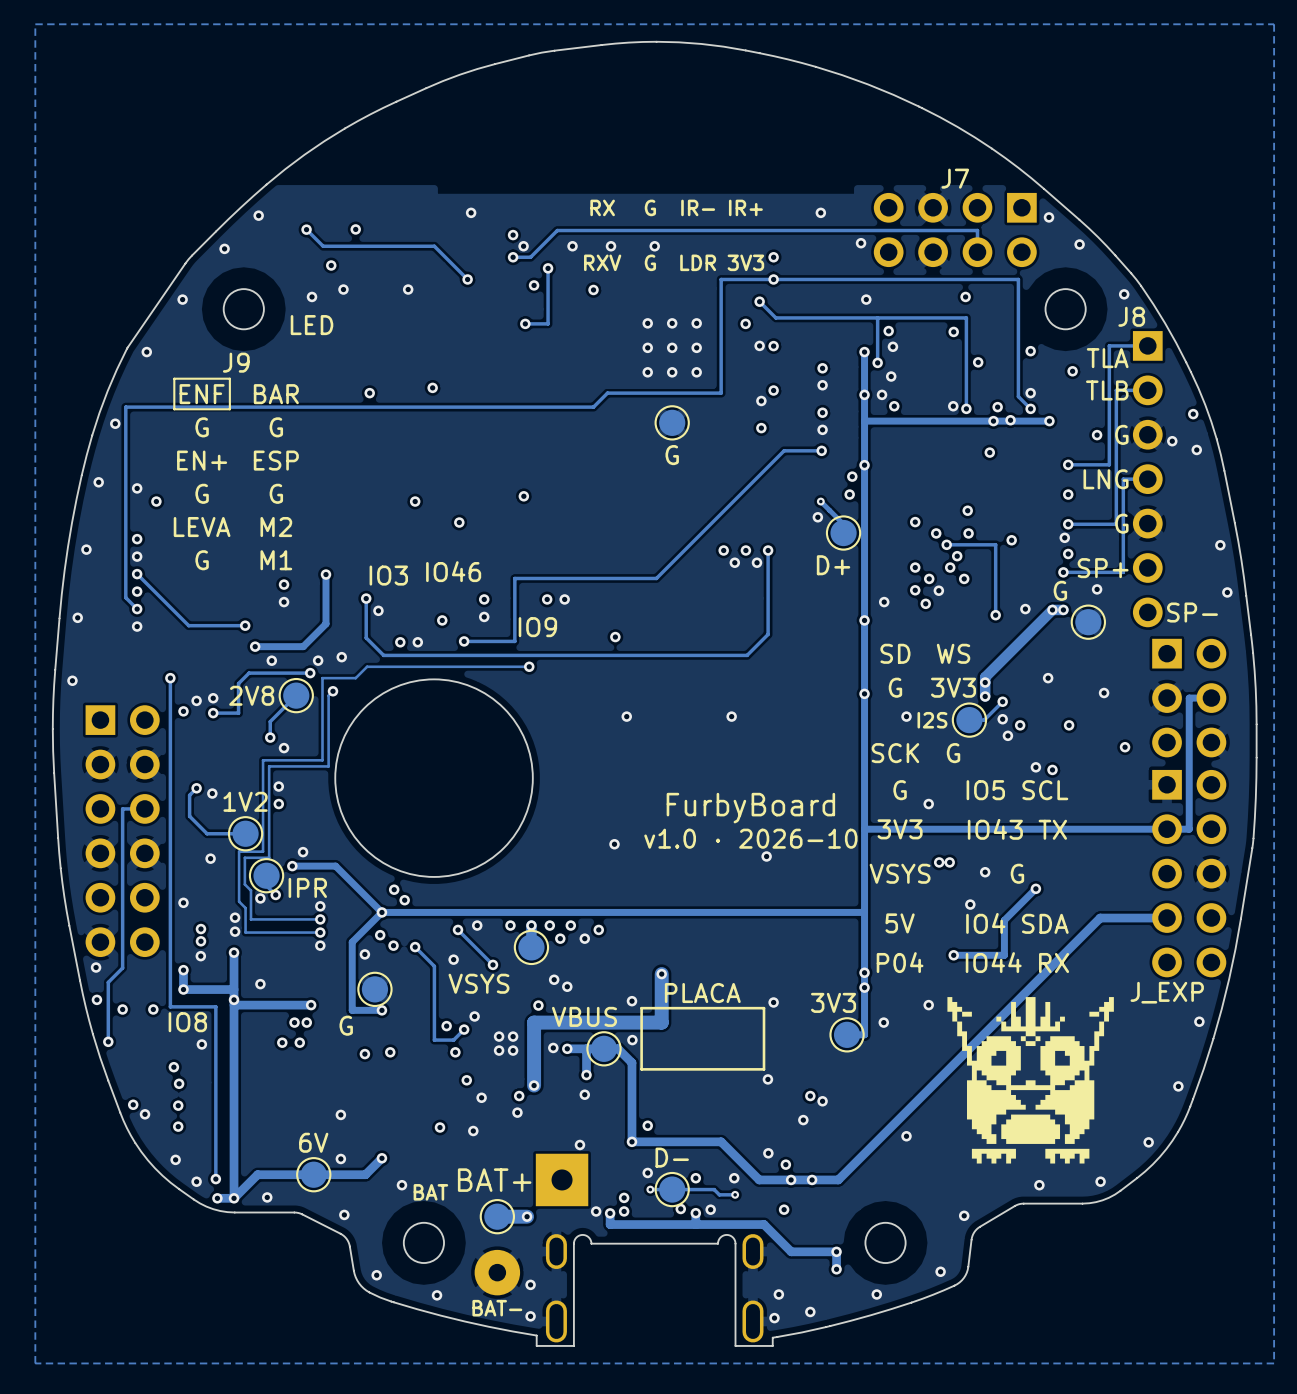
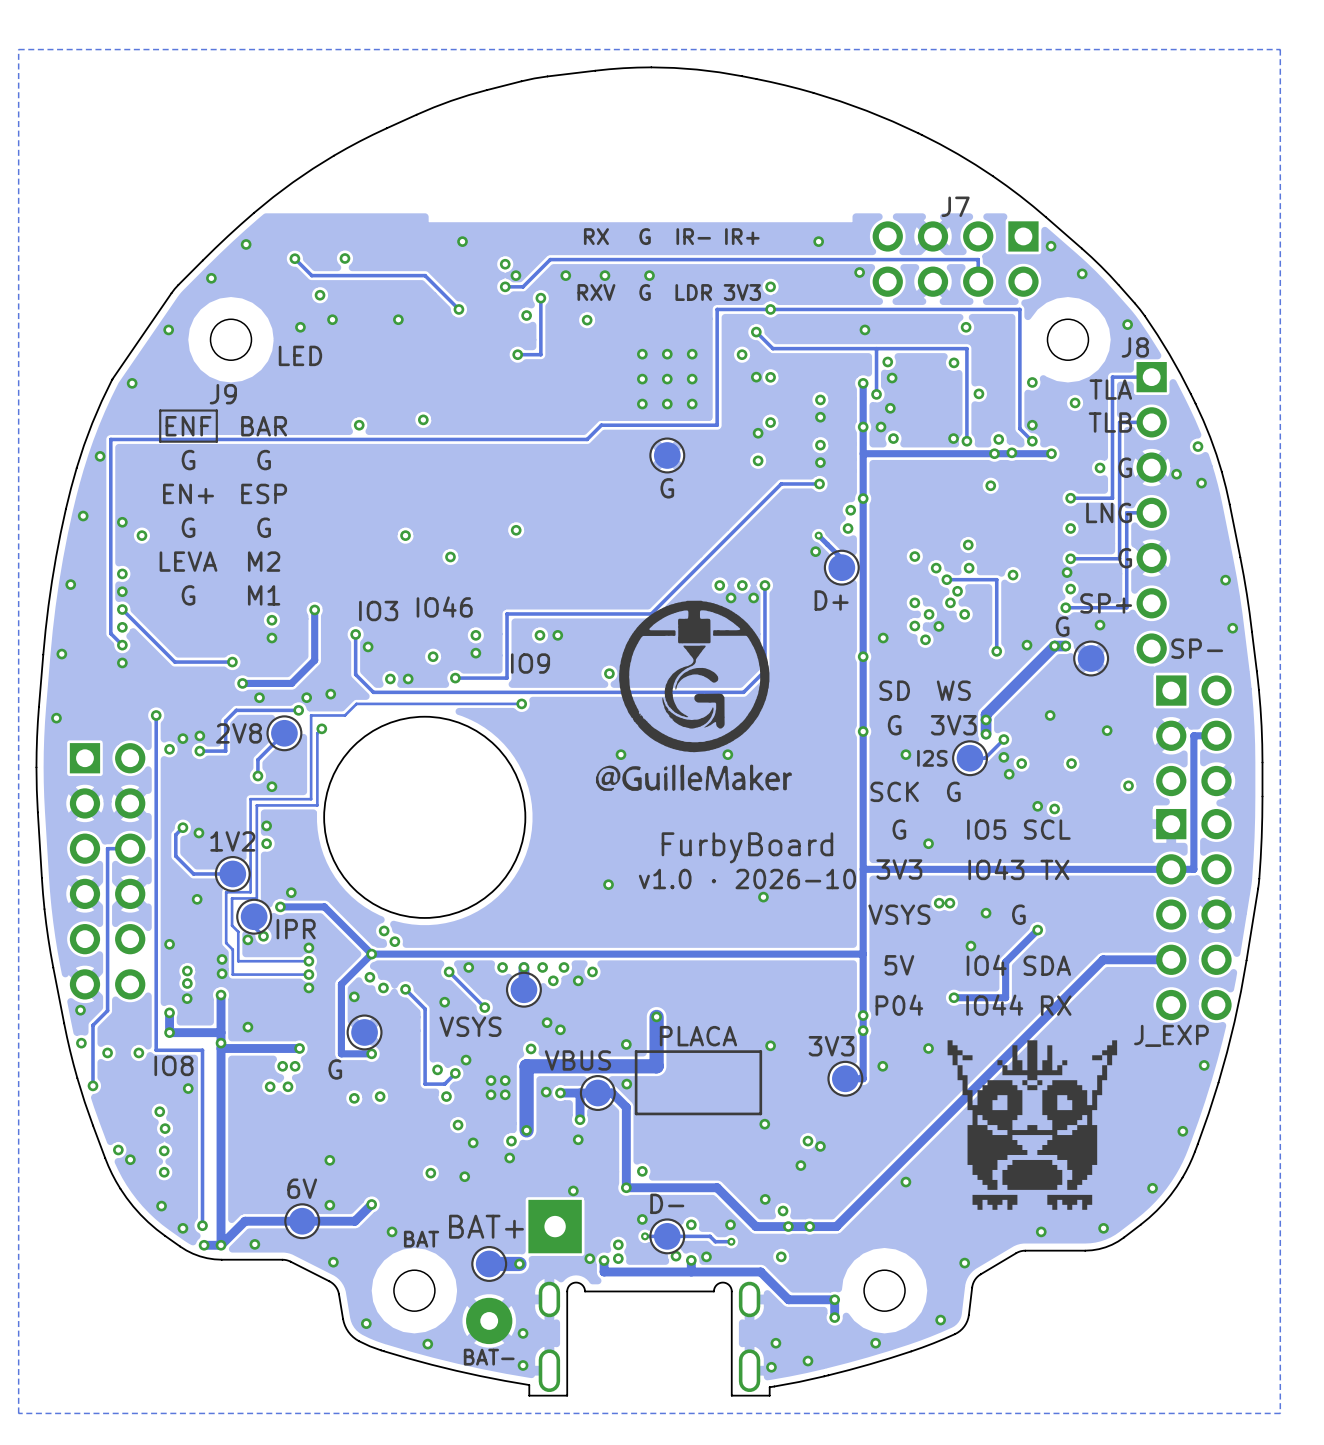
drawing: none -> [595, 600, 792, 791]

